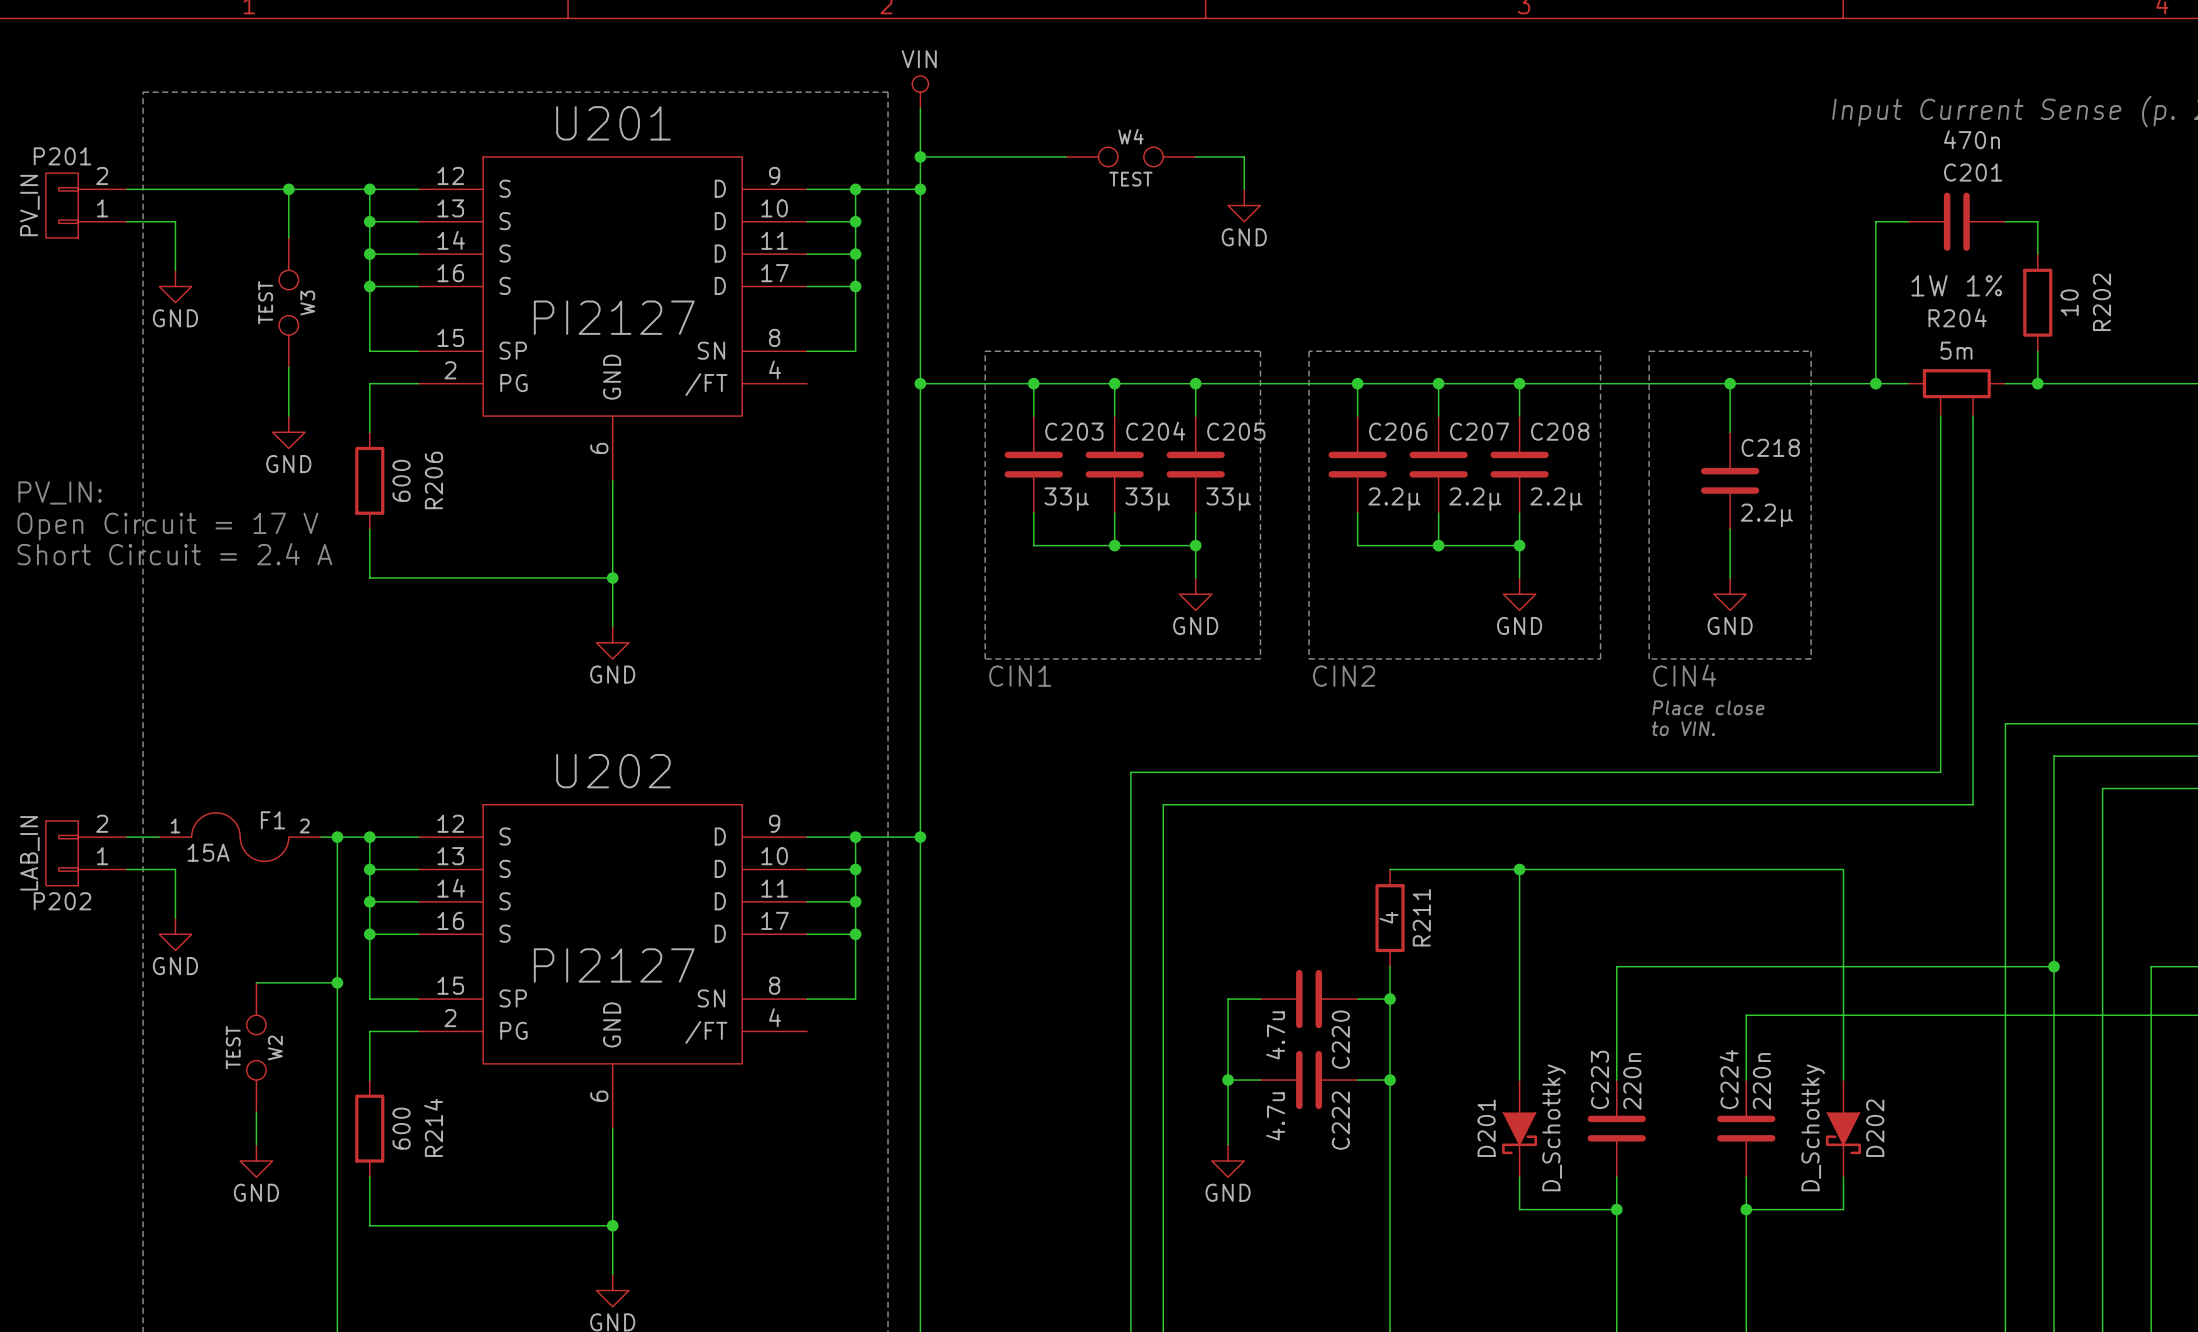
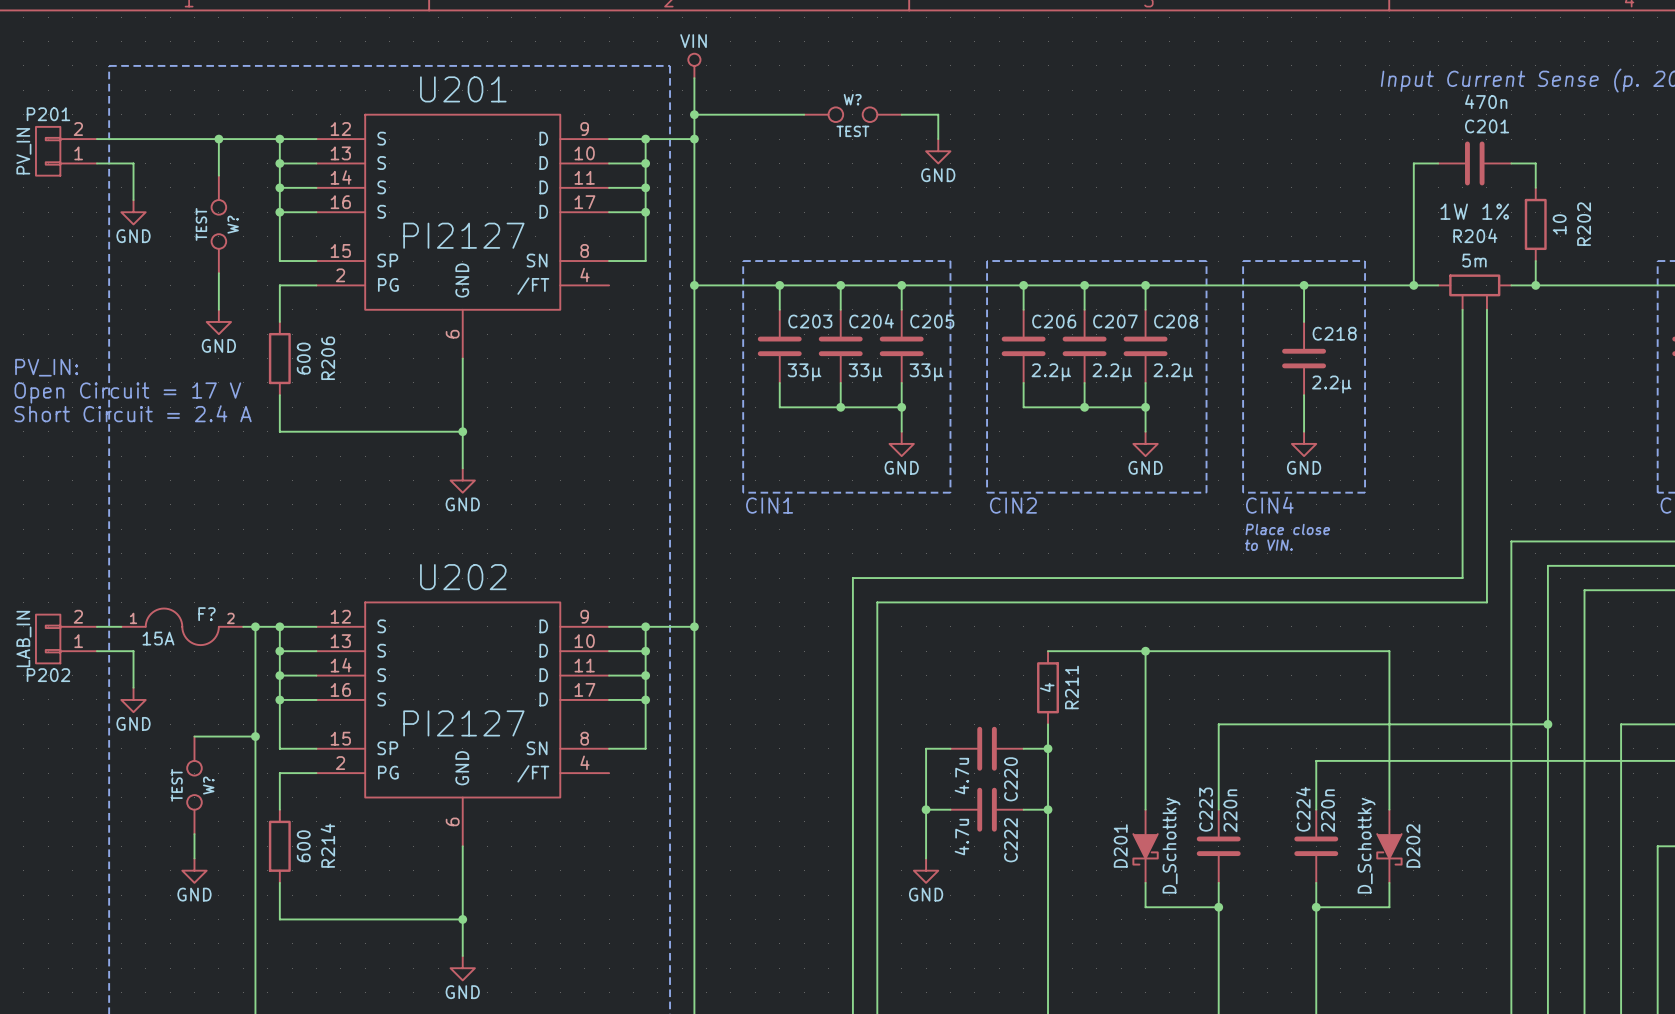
W4 name: W4 (1130, 136) -> W? (852, 99)
W3 name: W3 (307, 303) -> W? (233, 224)
F1 name: F1 (273, 820) -> F? (206, 614)
W2 name: W2 (275, 1047) -> W? (208, 785)

